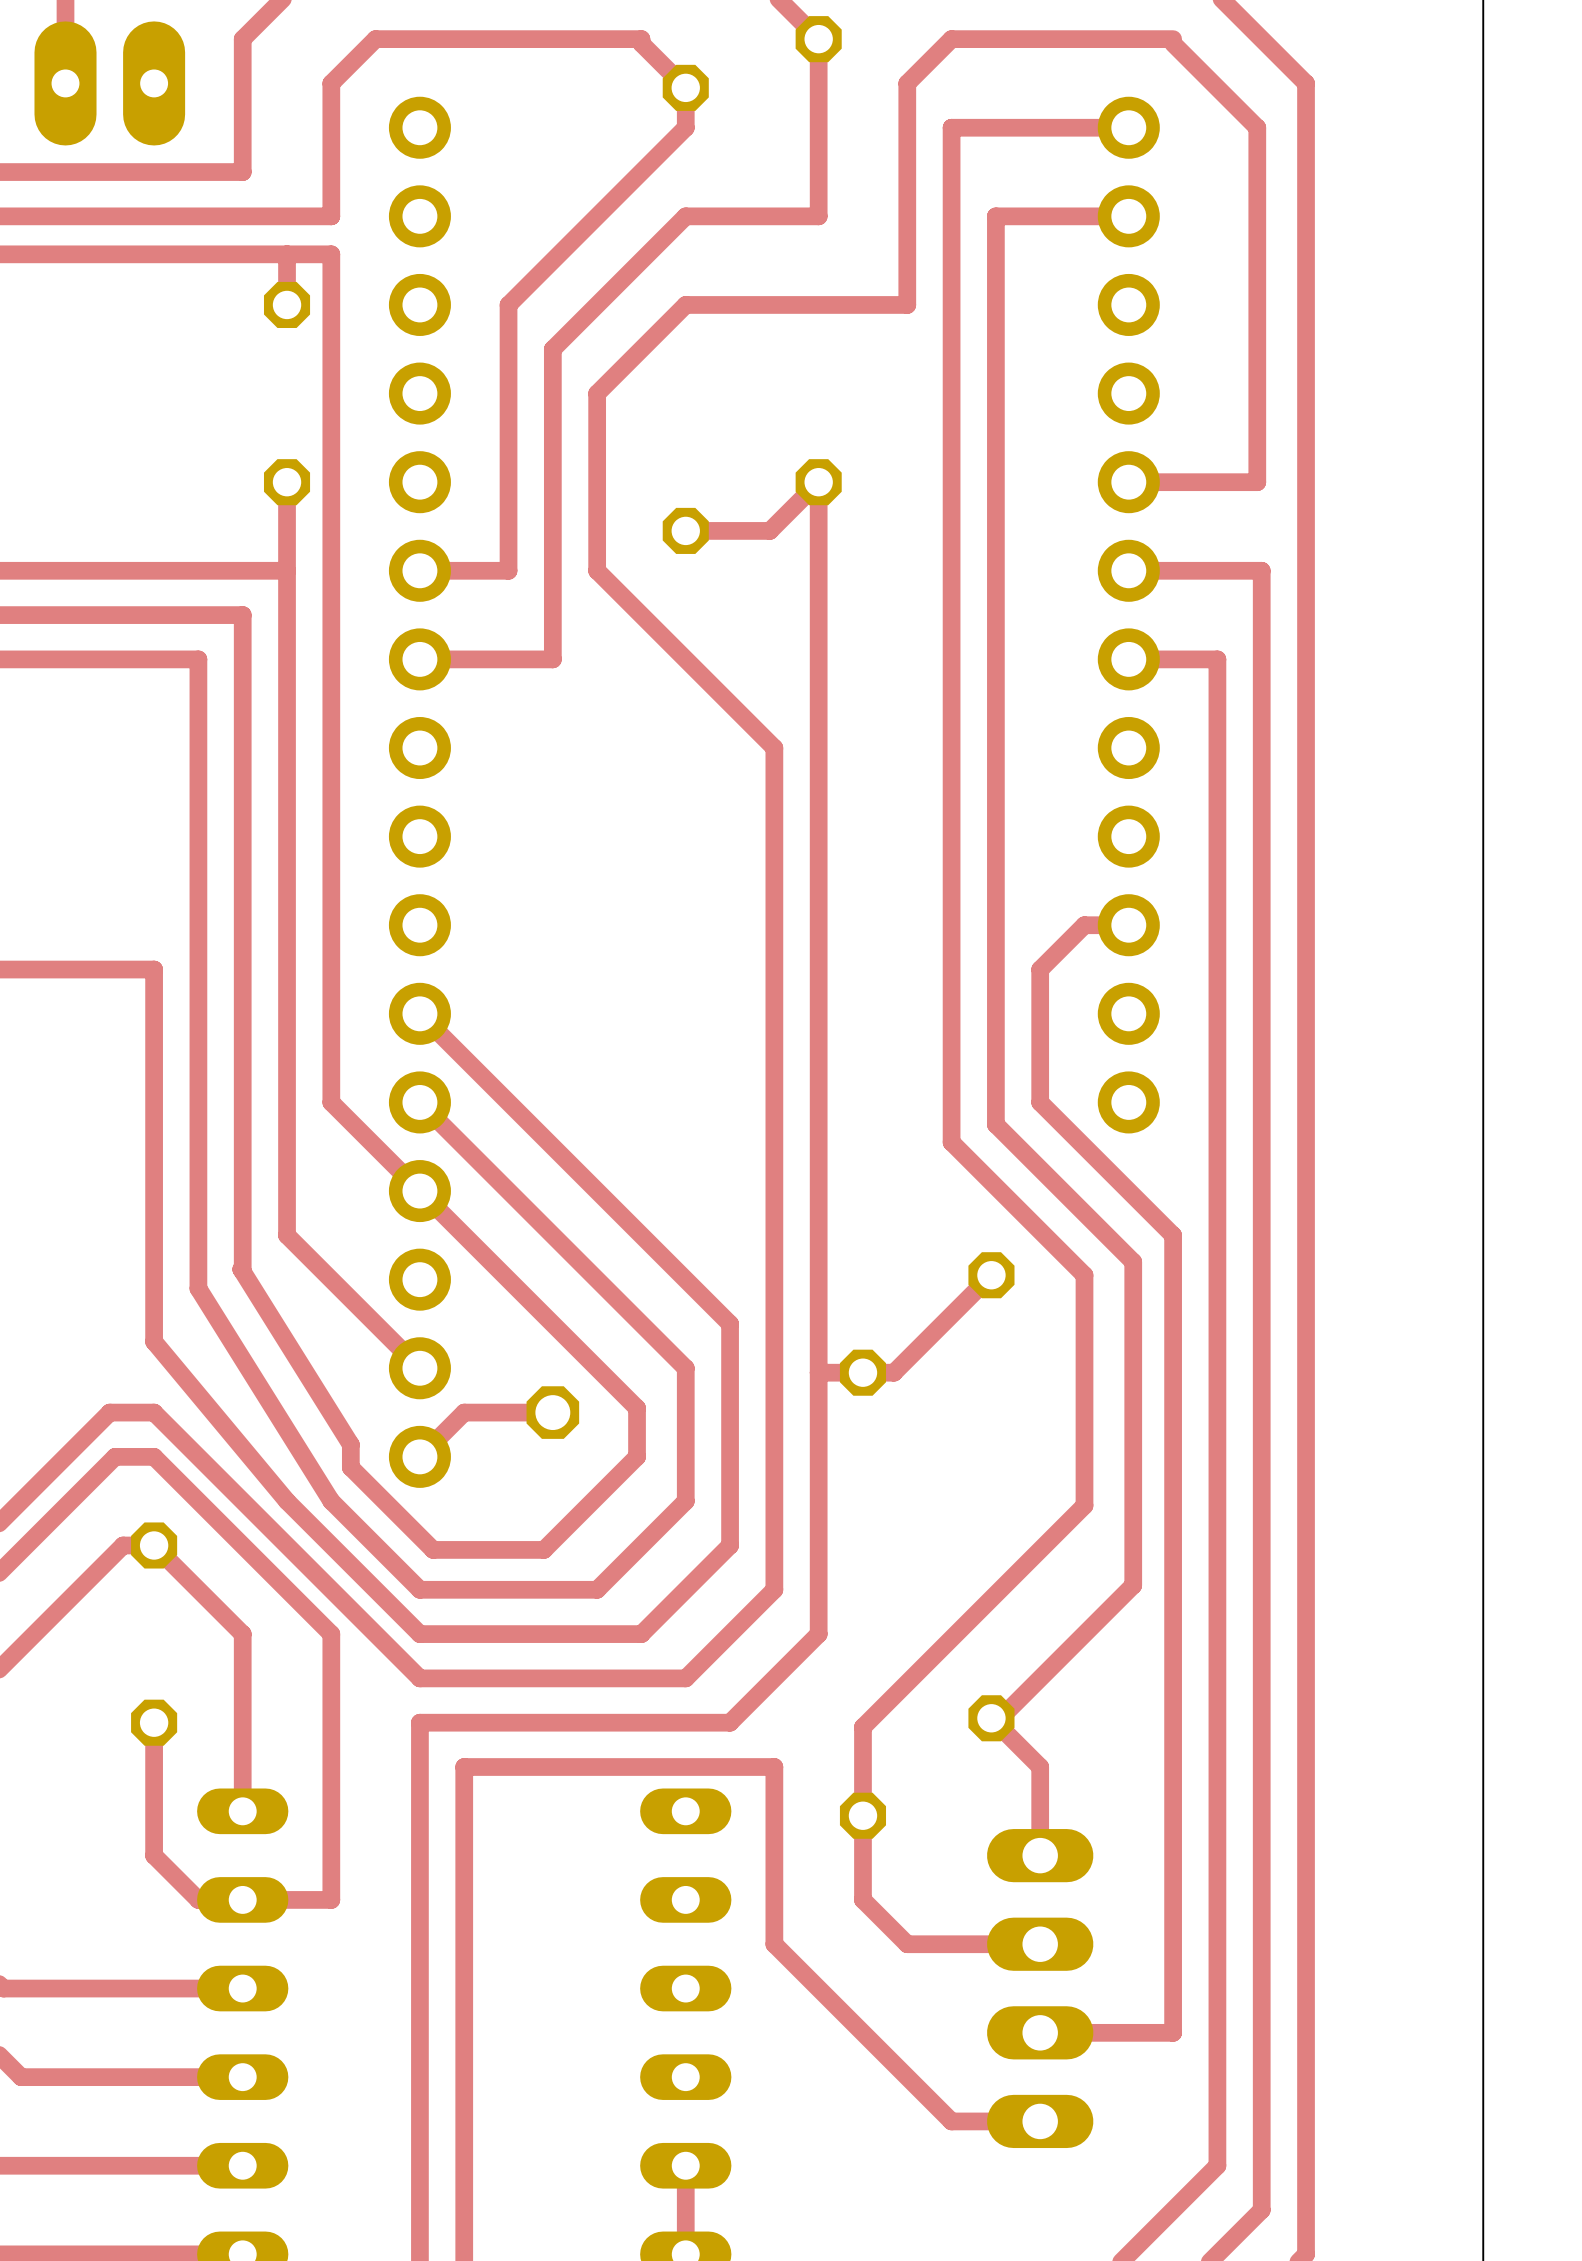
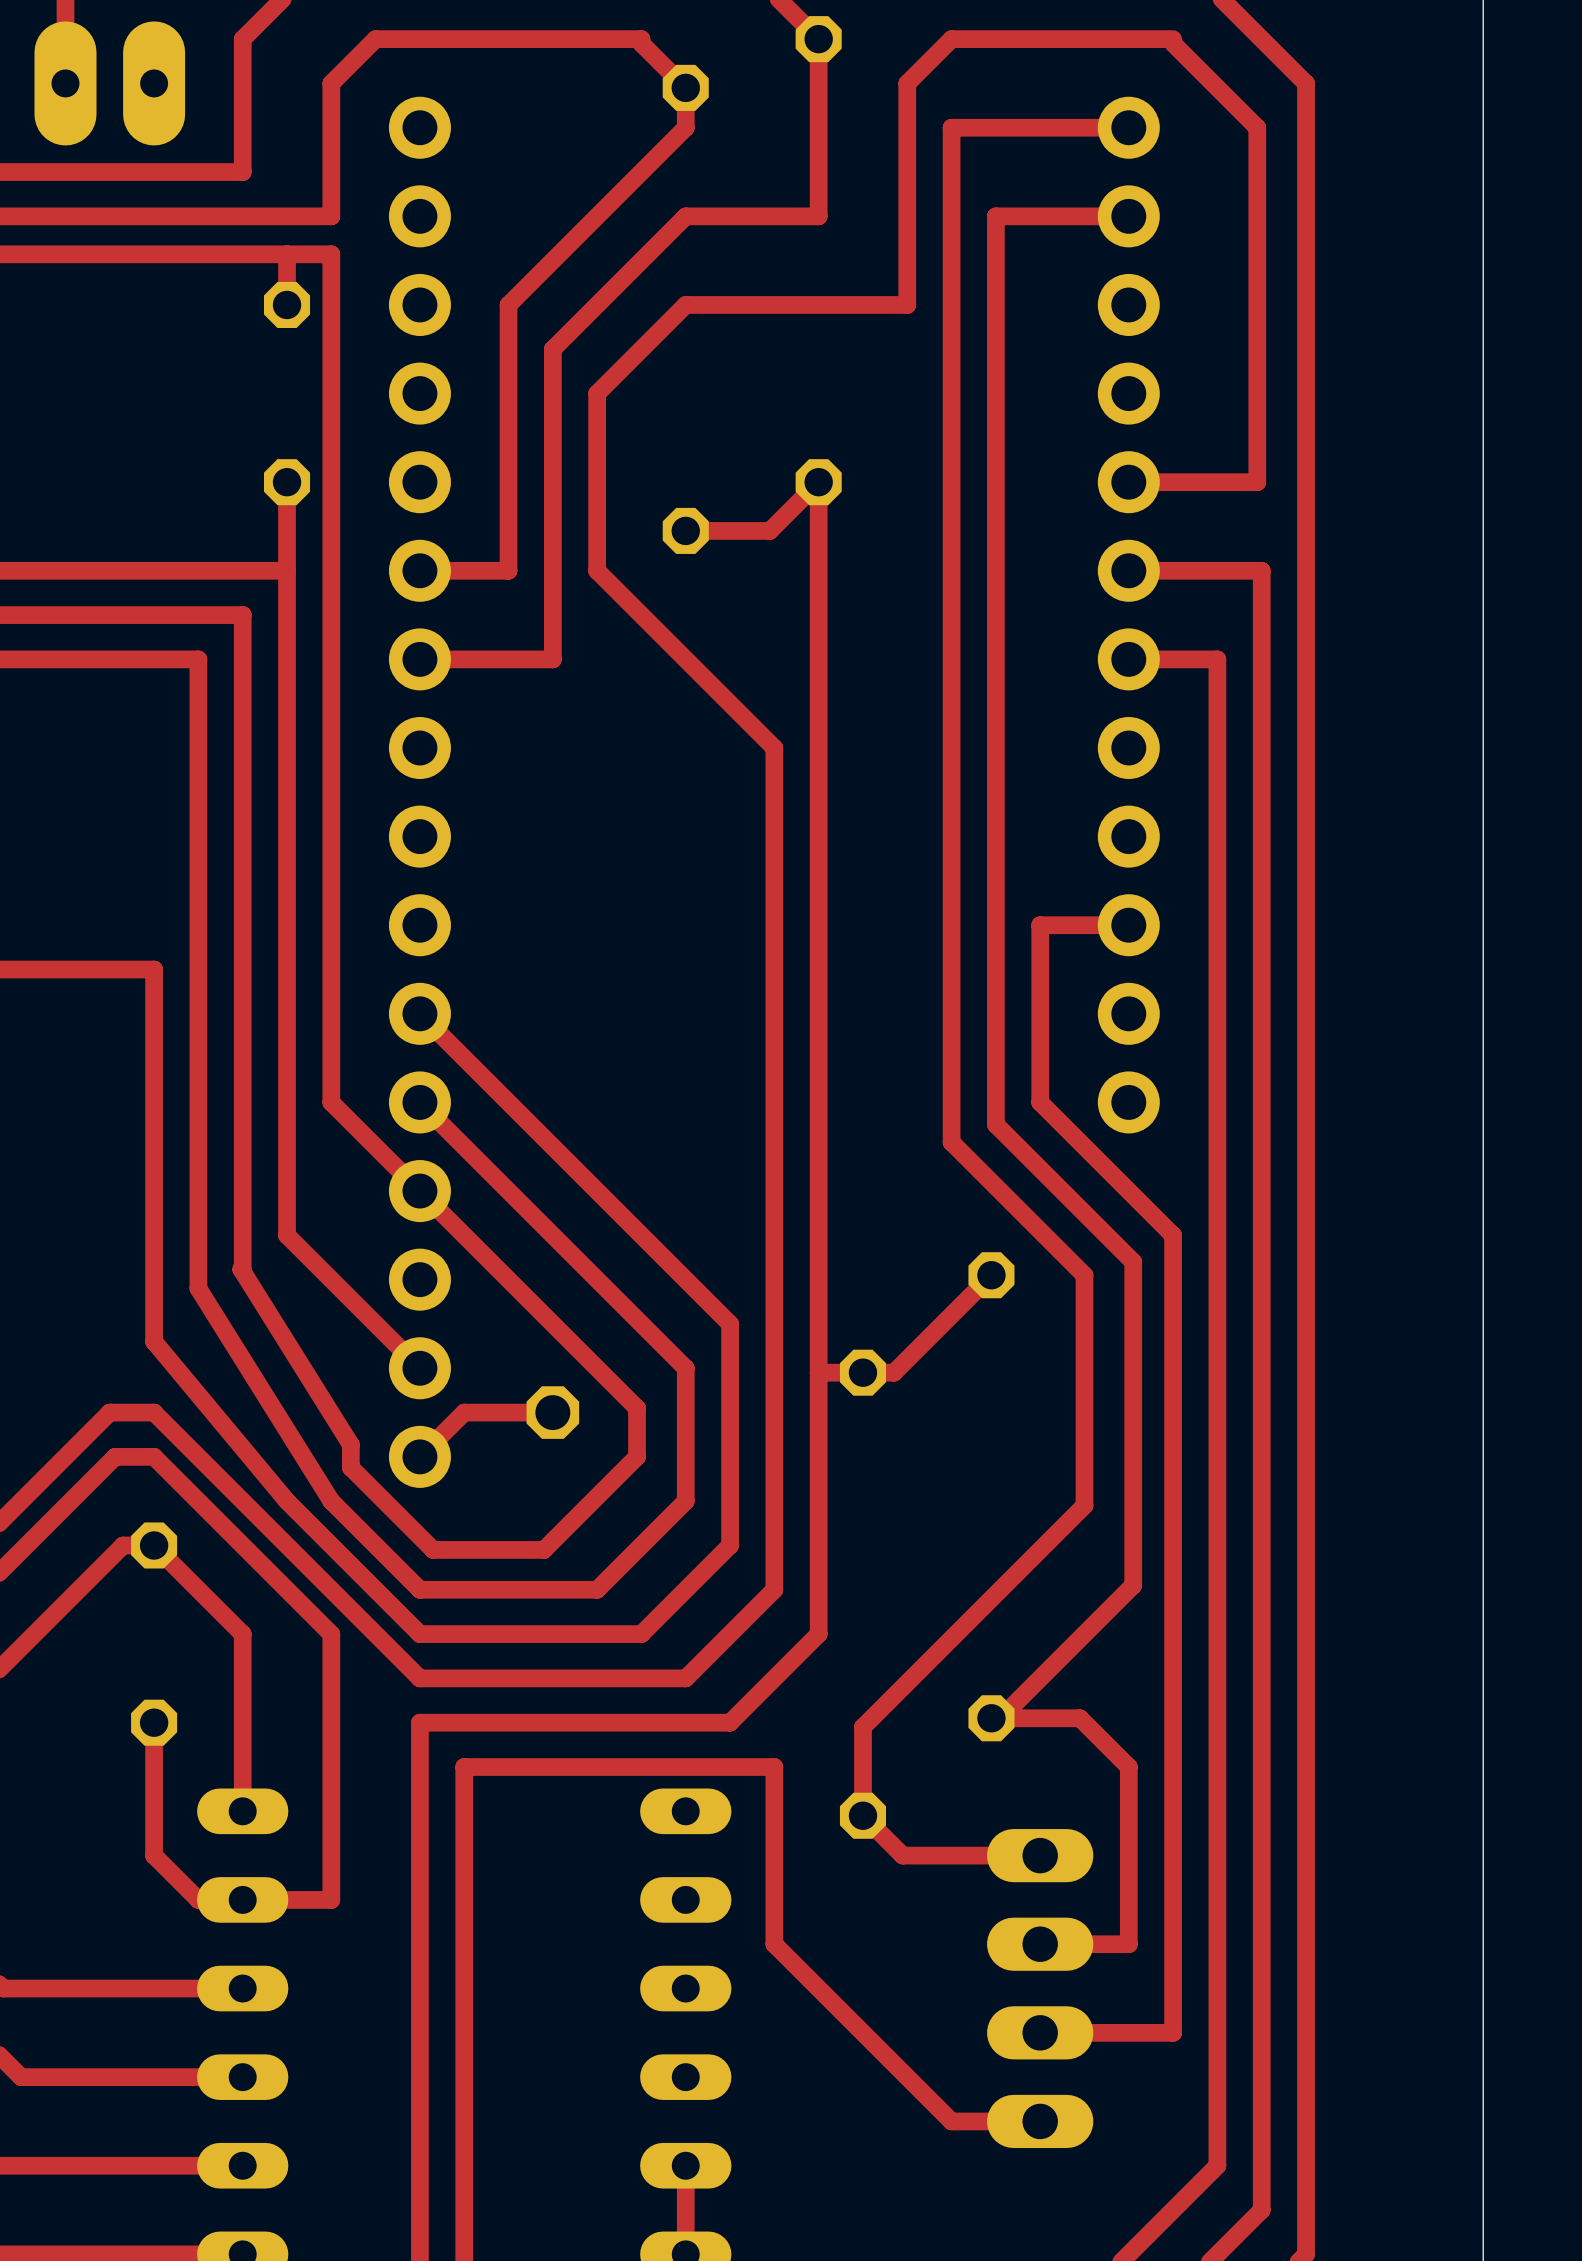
top track: (1084, 925) (1040, 969) -> (1084, 925) (1040, 925) (1040, 969)
top track: (991, 1718) (1040, 1767) (1040, 1855) -> none
top track: none -> (1000, 1718) (1080, 1718) (1128, 1767) (1128, 1944) (1040, 1944)
top track: (862, 1815) (862, 1899) (907, 1944) (995, 1944) -> (862, 1815) (902, 1855) (1040, 1855)

